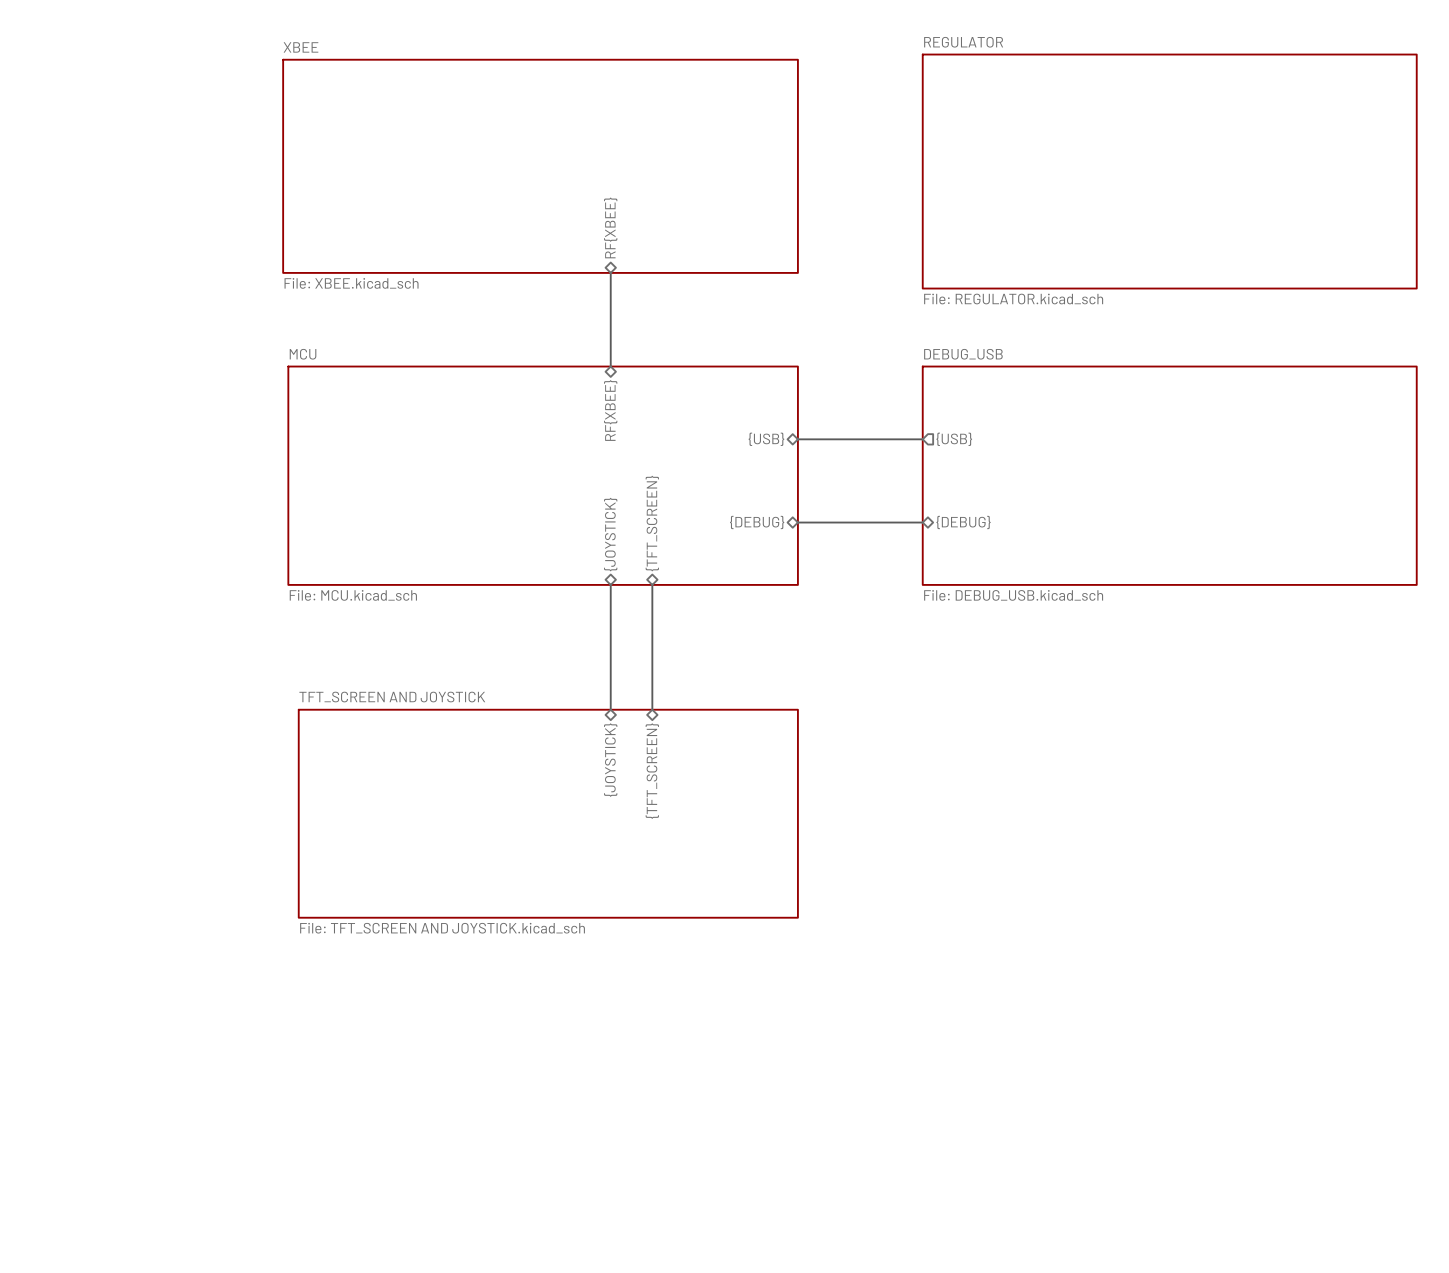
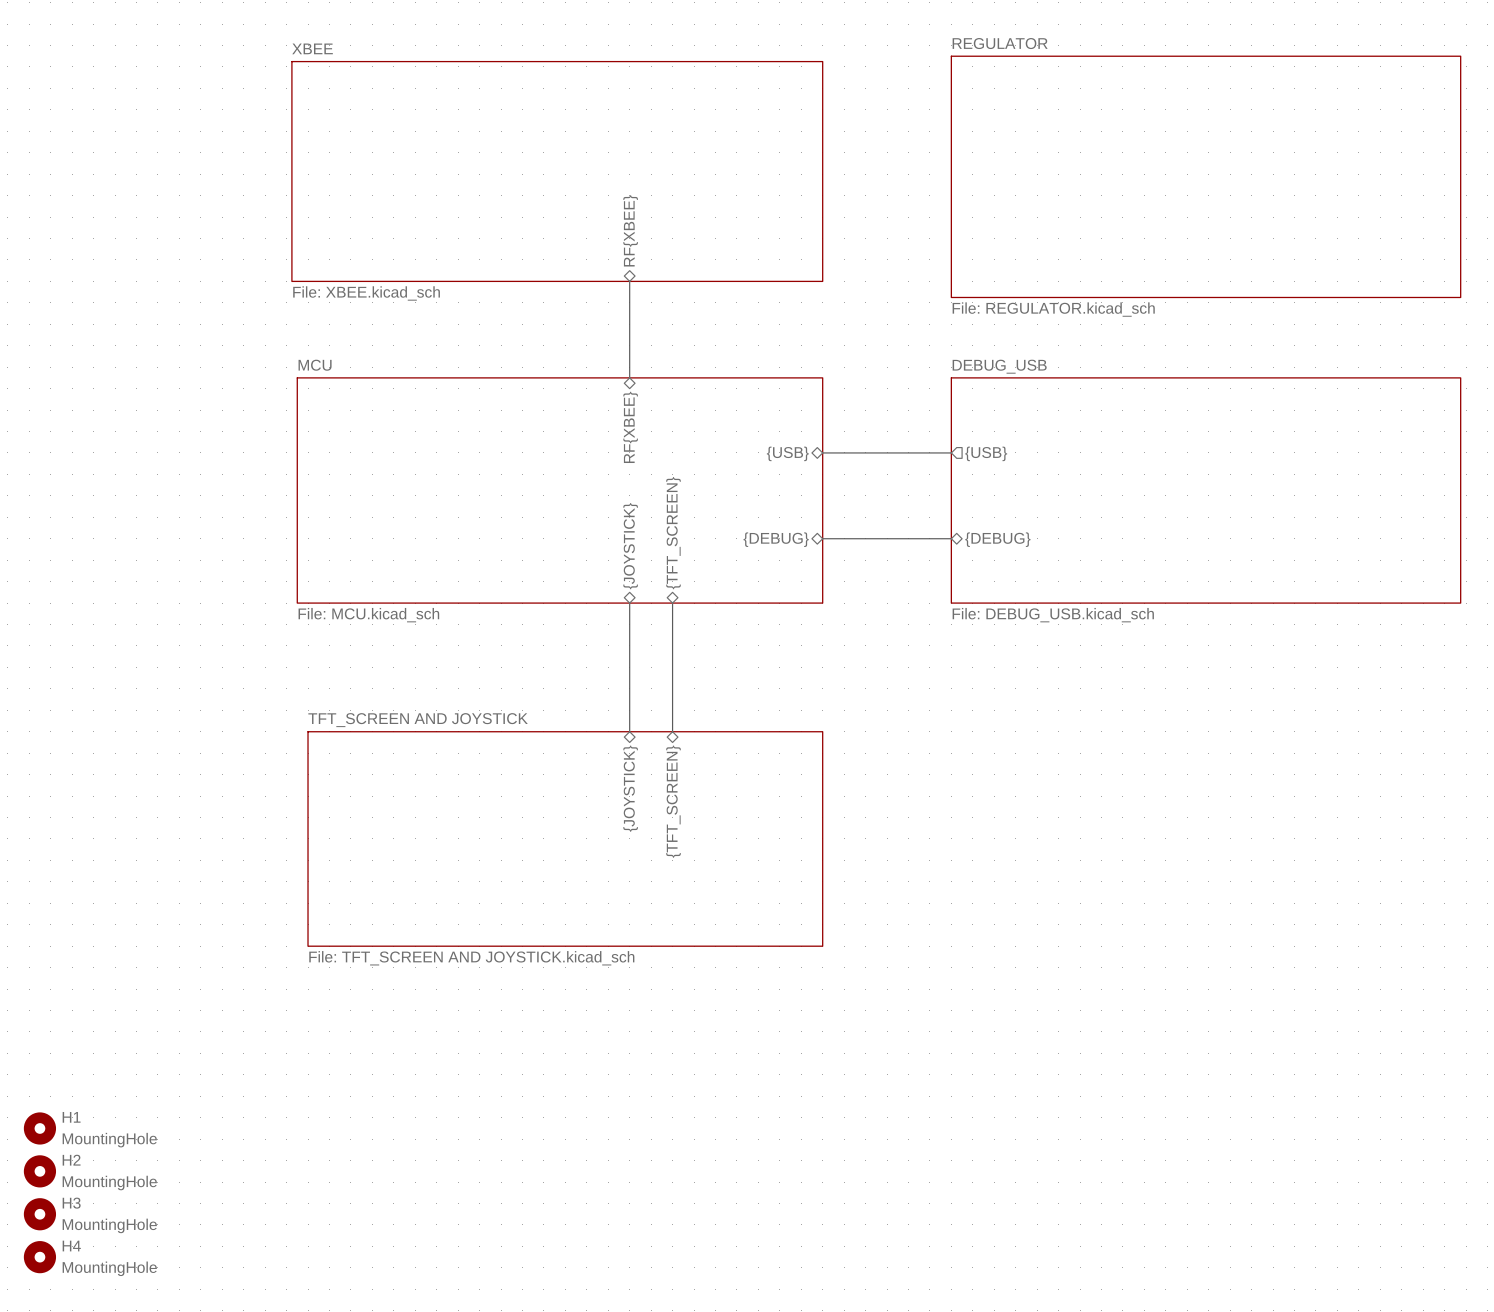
H1: none -> MountingHole (39, 1128)
H2: none -> MountingHole (39, 1171)
H3: none -> MountingHole (39, 1214)
H4: none -> MountingHole (39, 1257)

